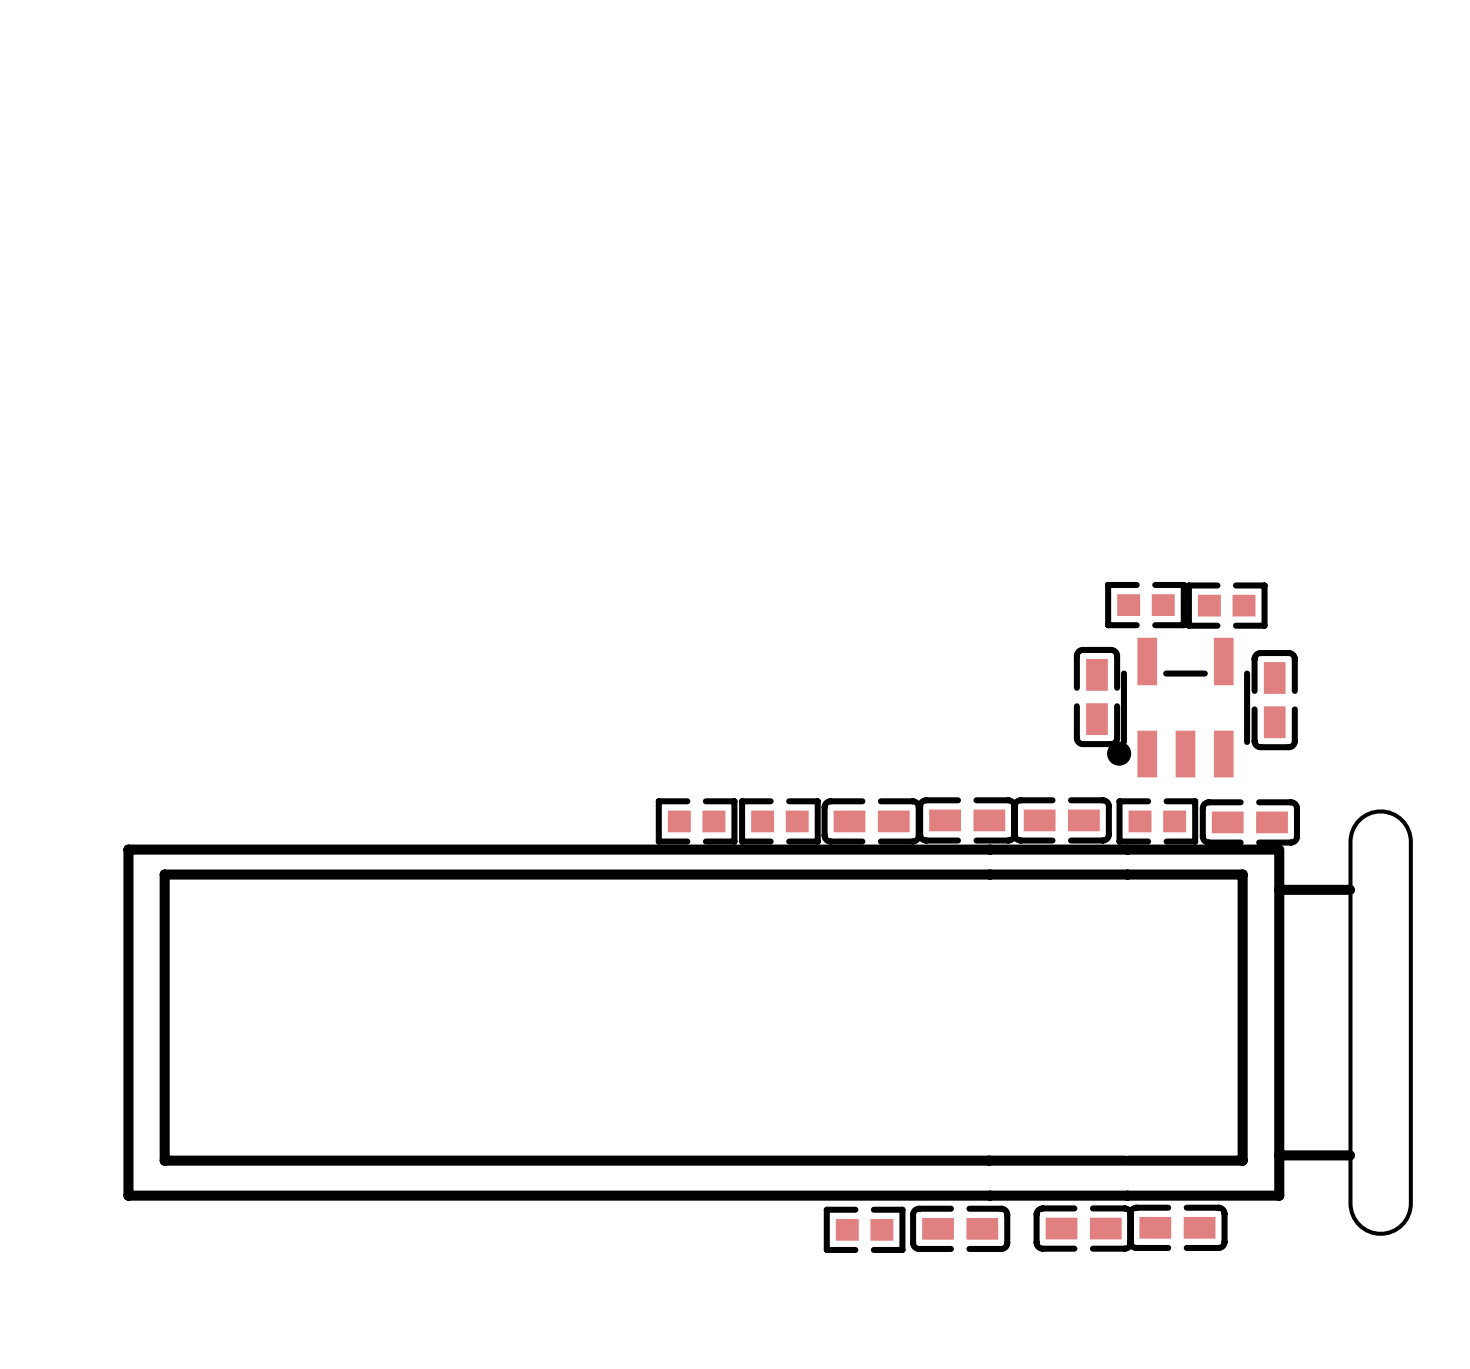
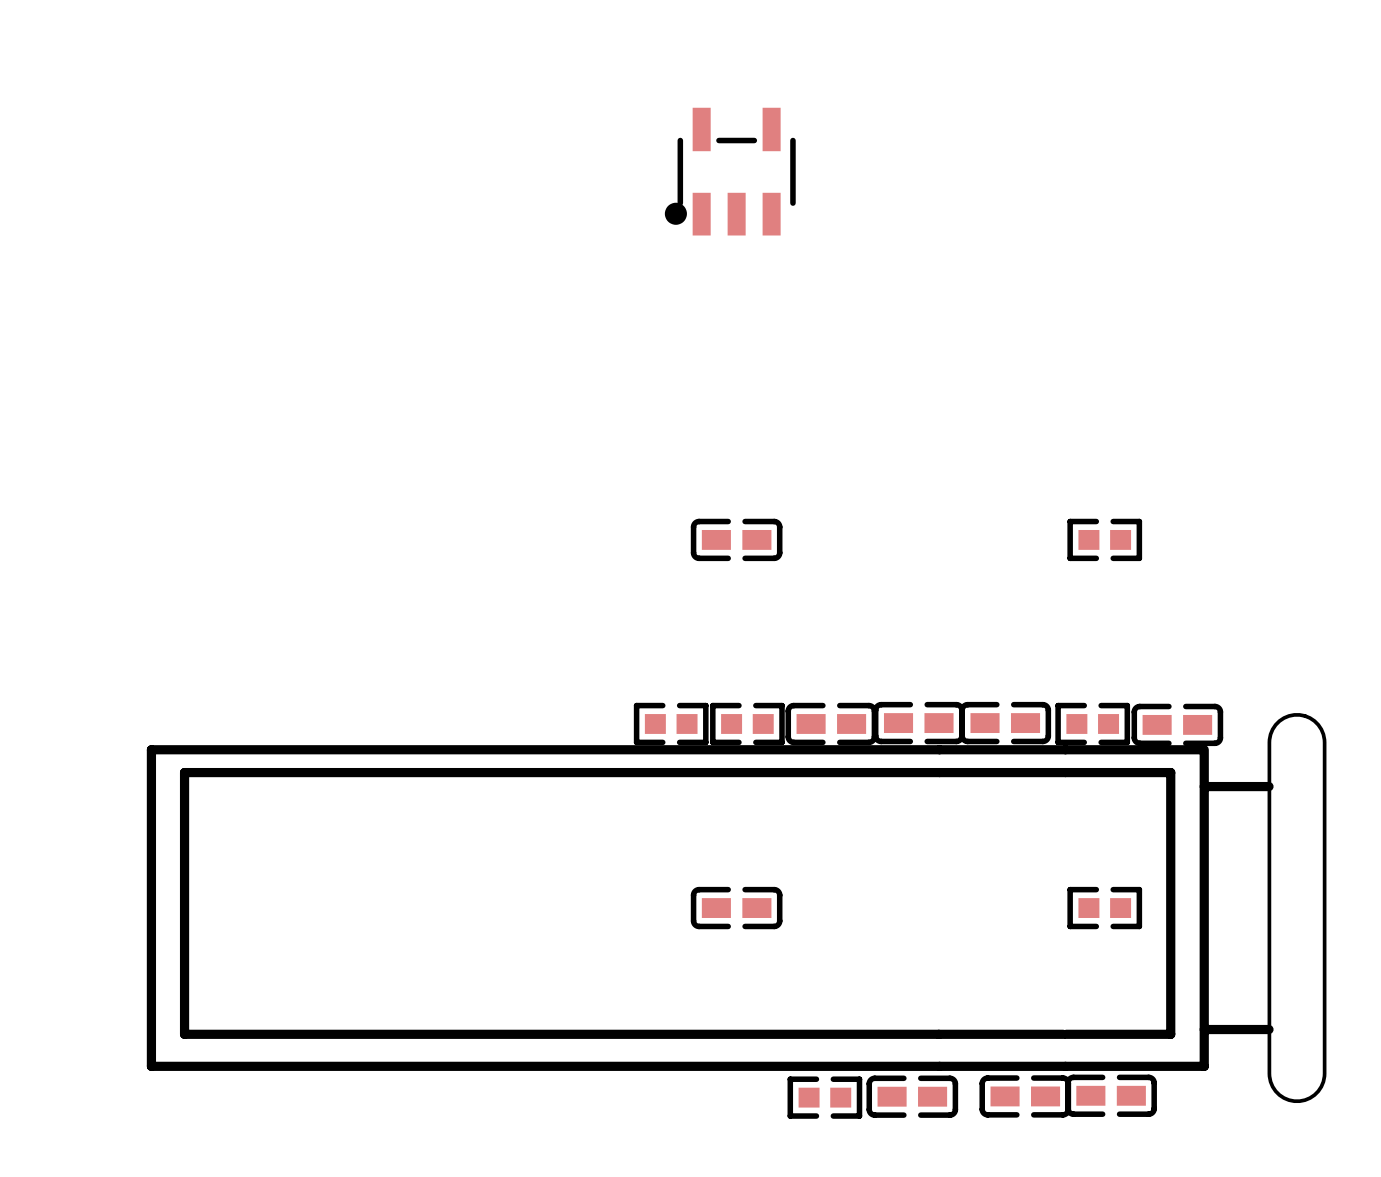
part: (1145, 605) -> none
part: (1226, 605) -> none
part: none -> (736, 539)
part: none -> (1104, 539)
part: (1096, 697) -> none
part: (1274, 700) -> none
part position: (1178, 707) -> (730, 171)
part: none -> (736, 908)
part: none -> (1104, 908)

